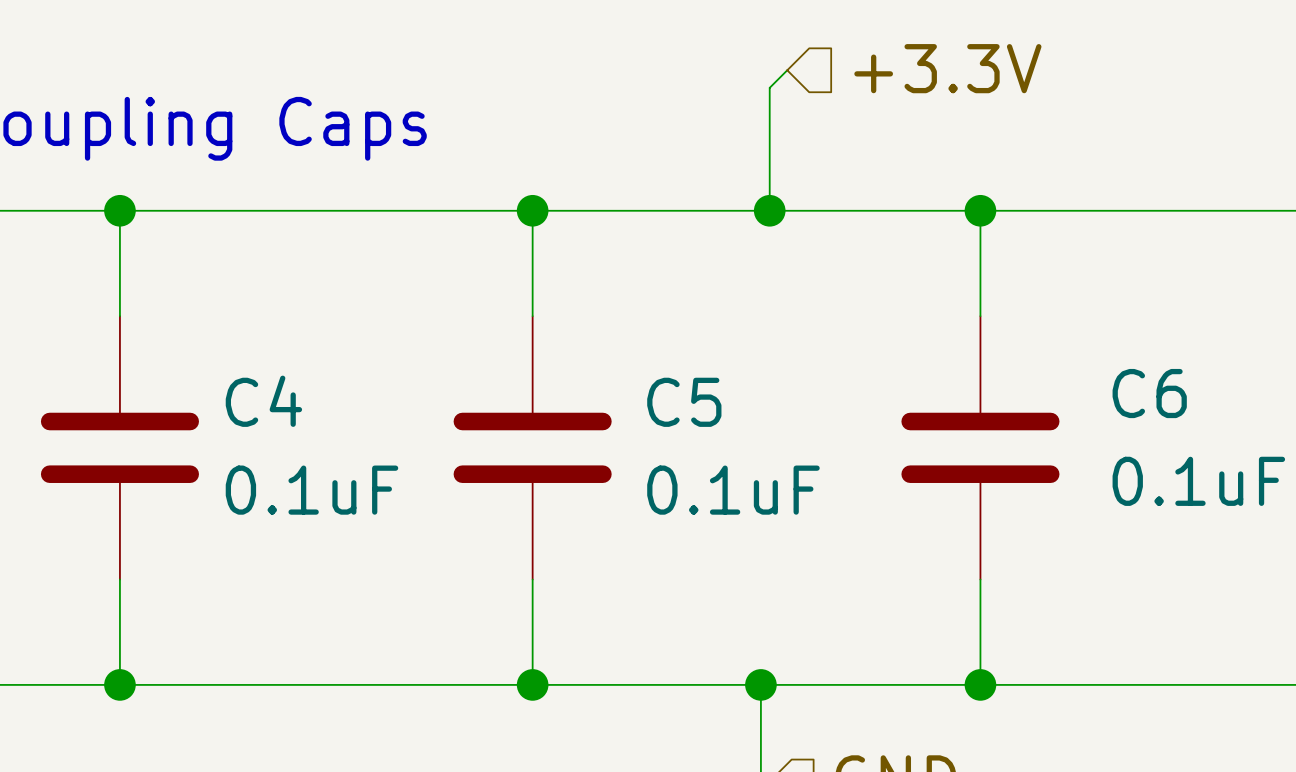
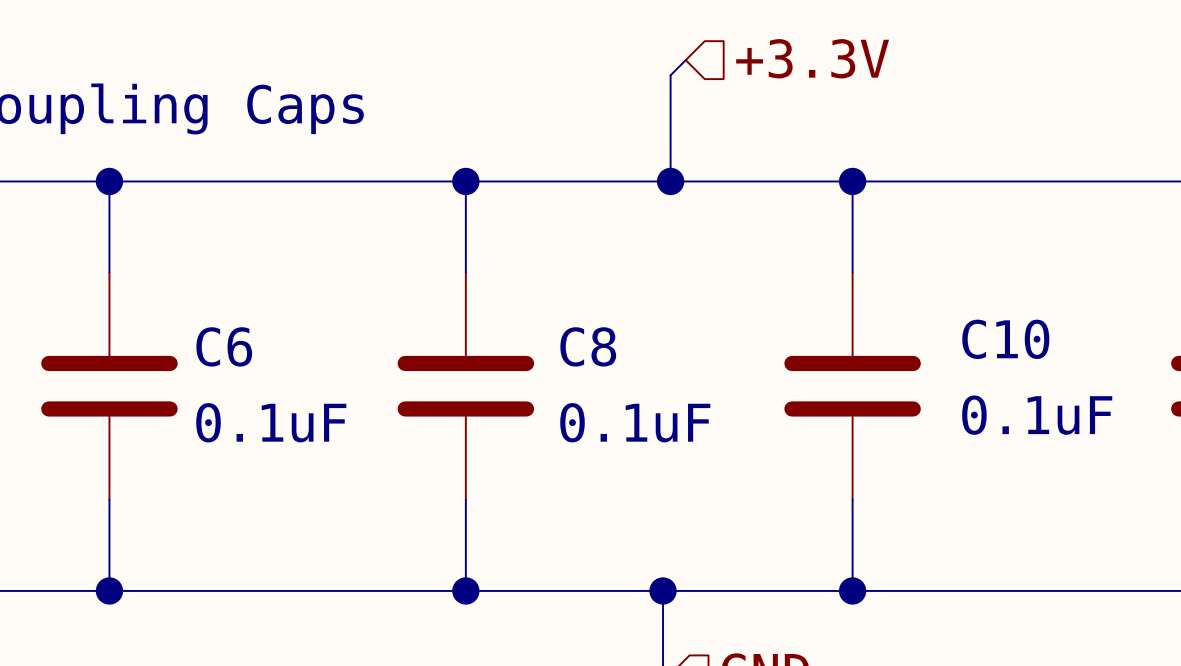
C6 name: C6 (1149, 393) -> C10 (1005, 339)
C4 name: C4 (263, 401) -> C6 (224, 346)
C5 name: C5 (684, 402) -> C8 (588, 346)

